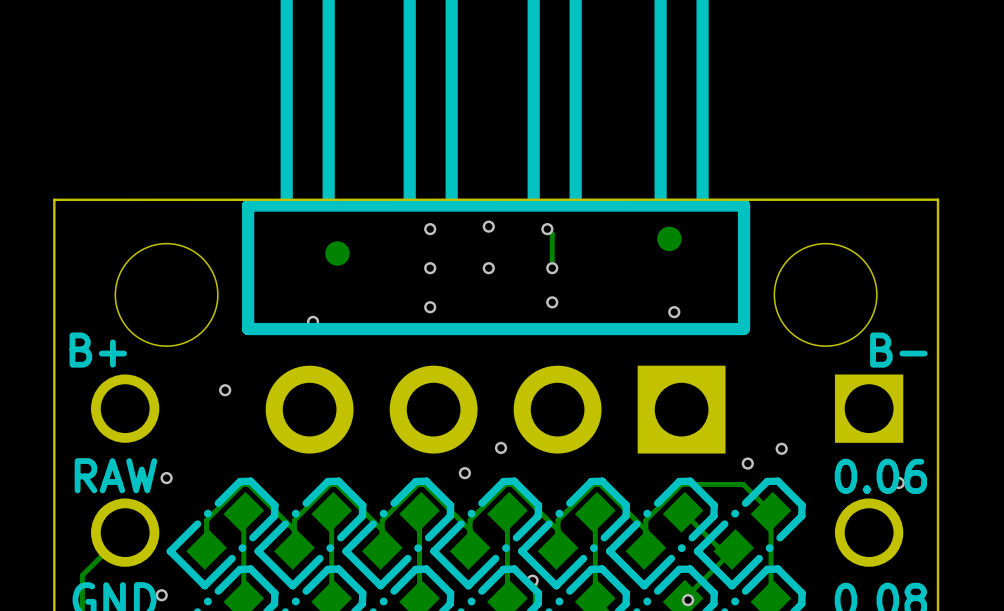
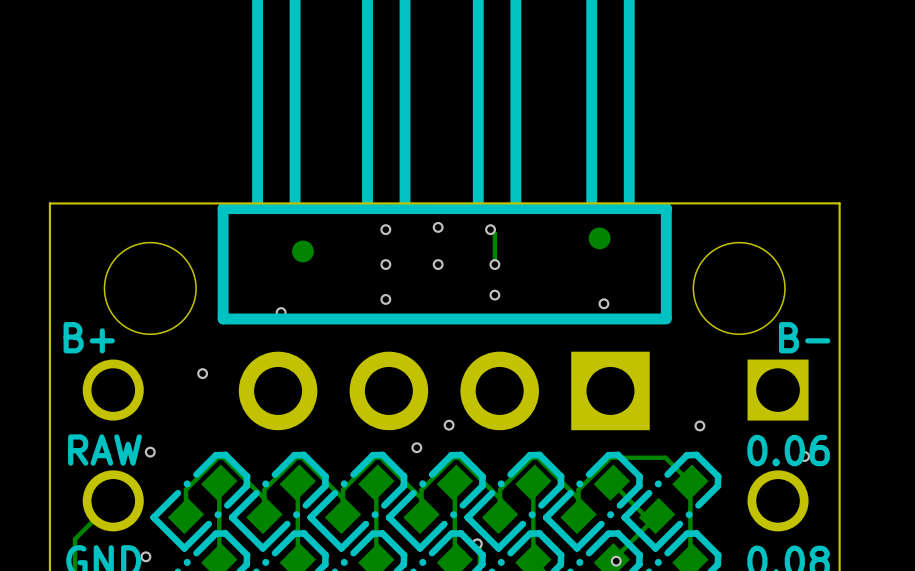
via: (747, 463) -> none

